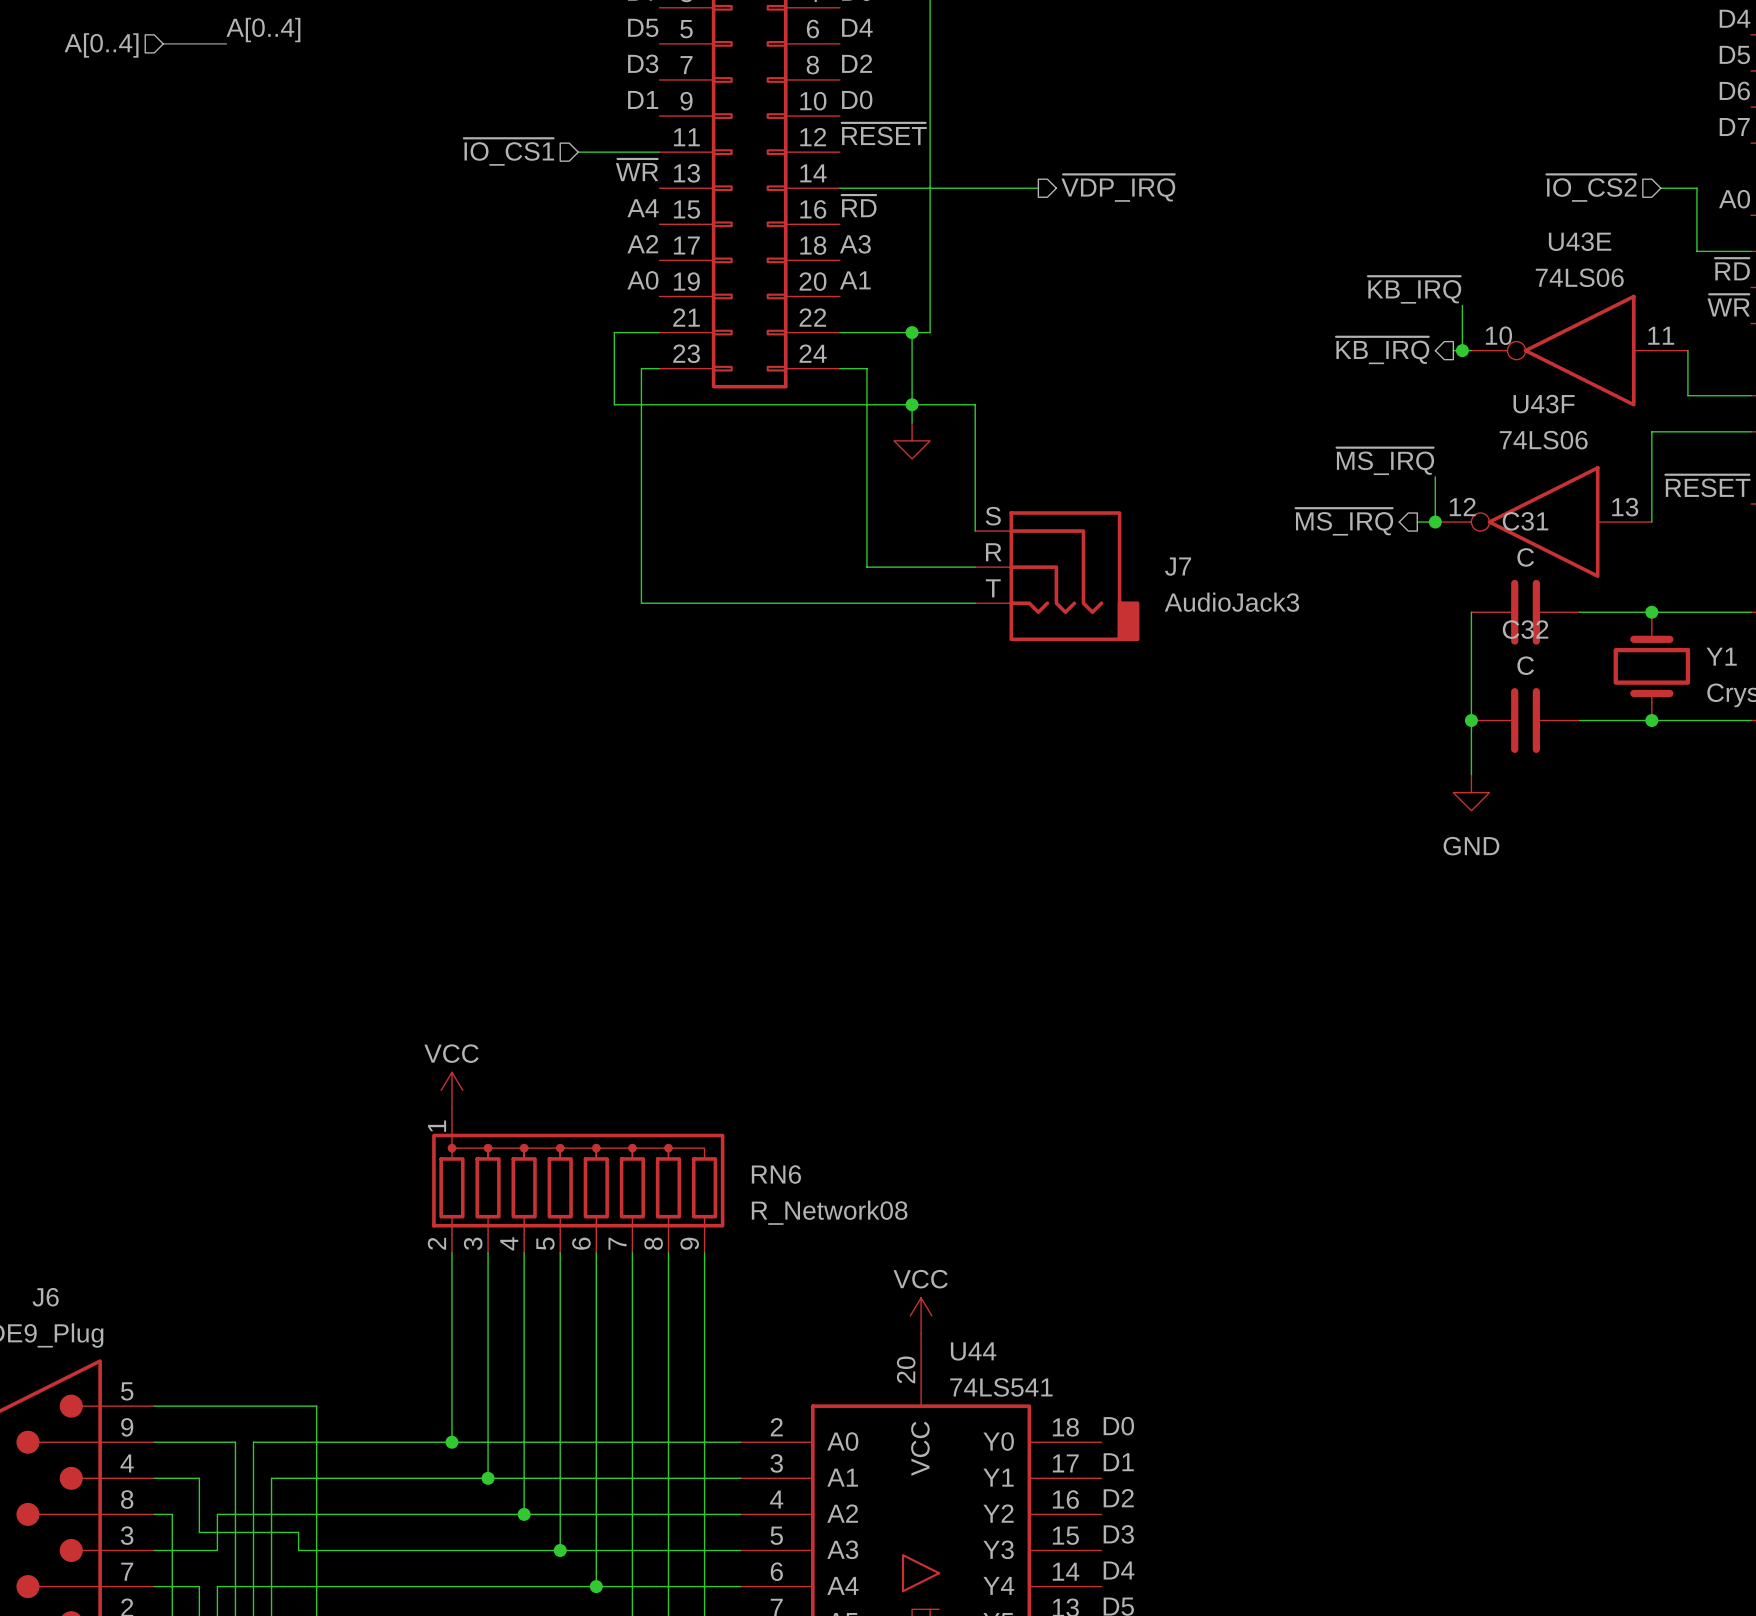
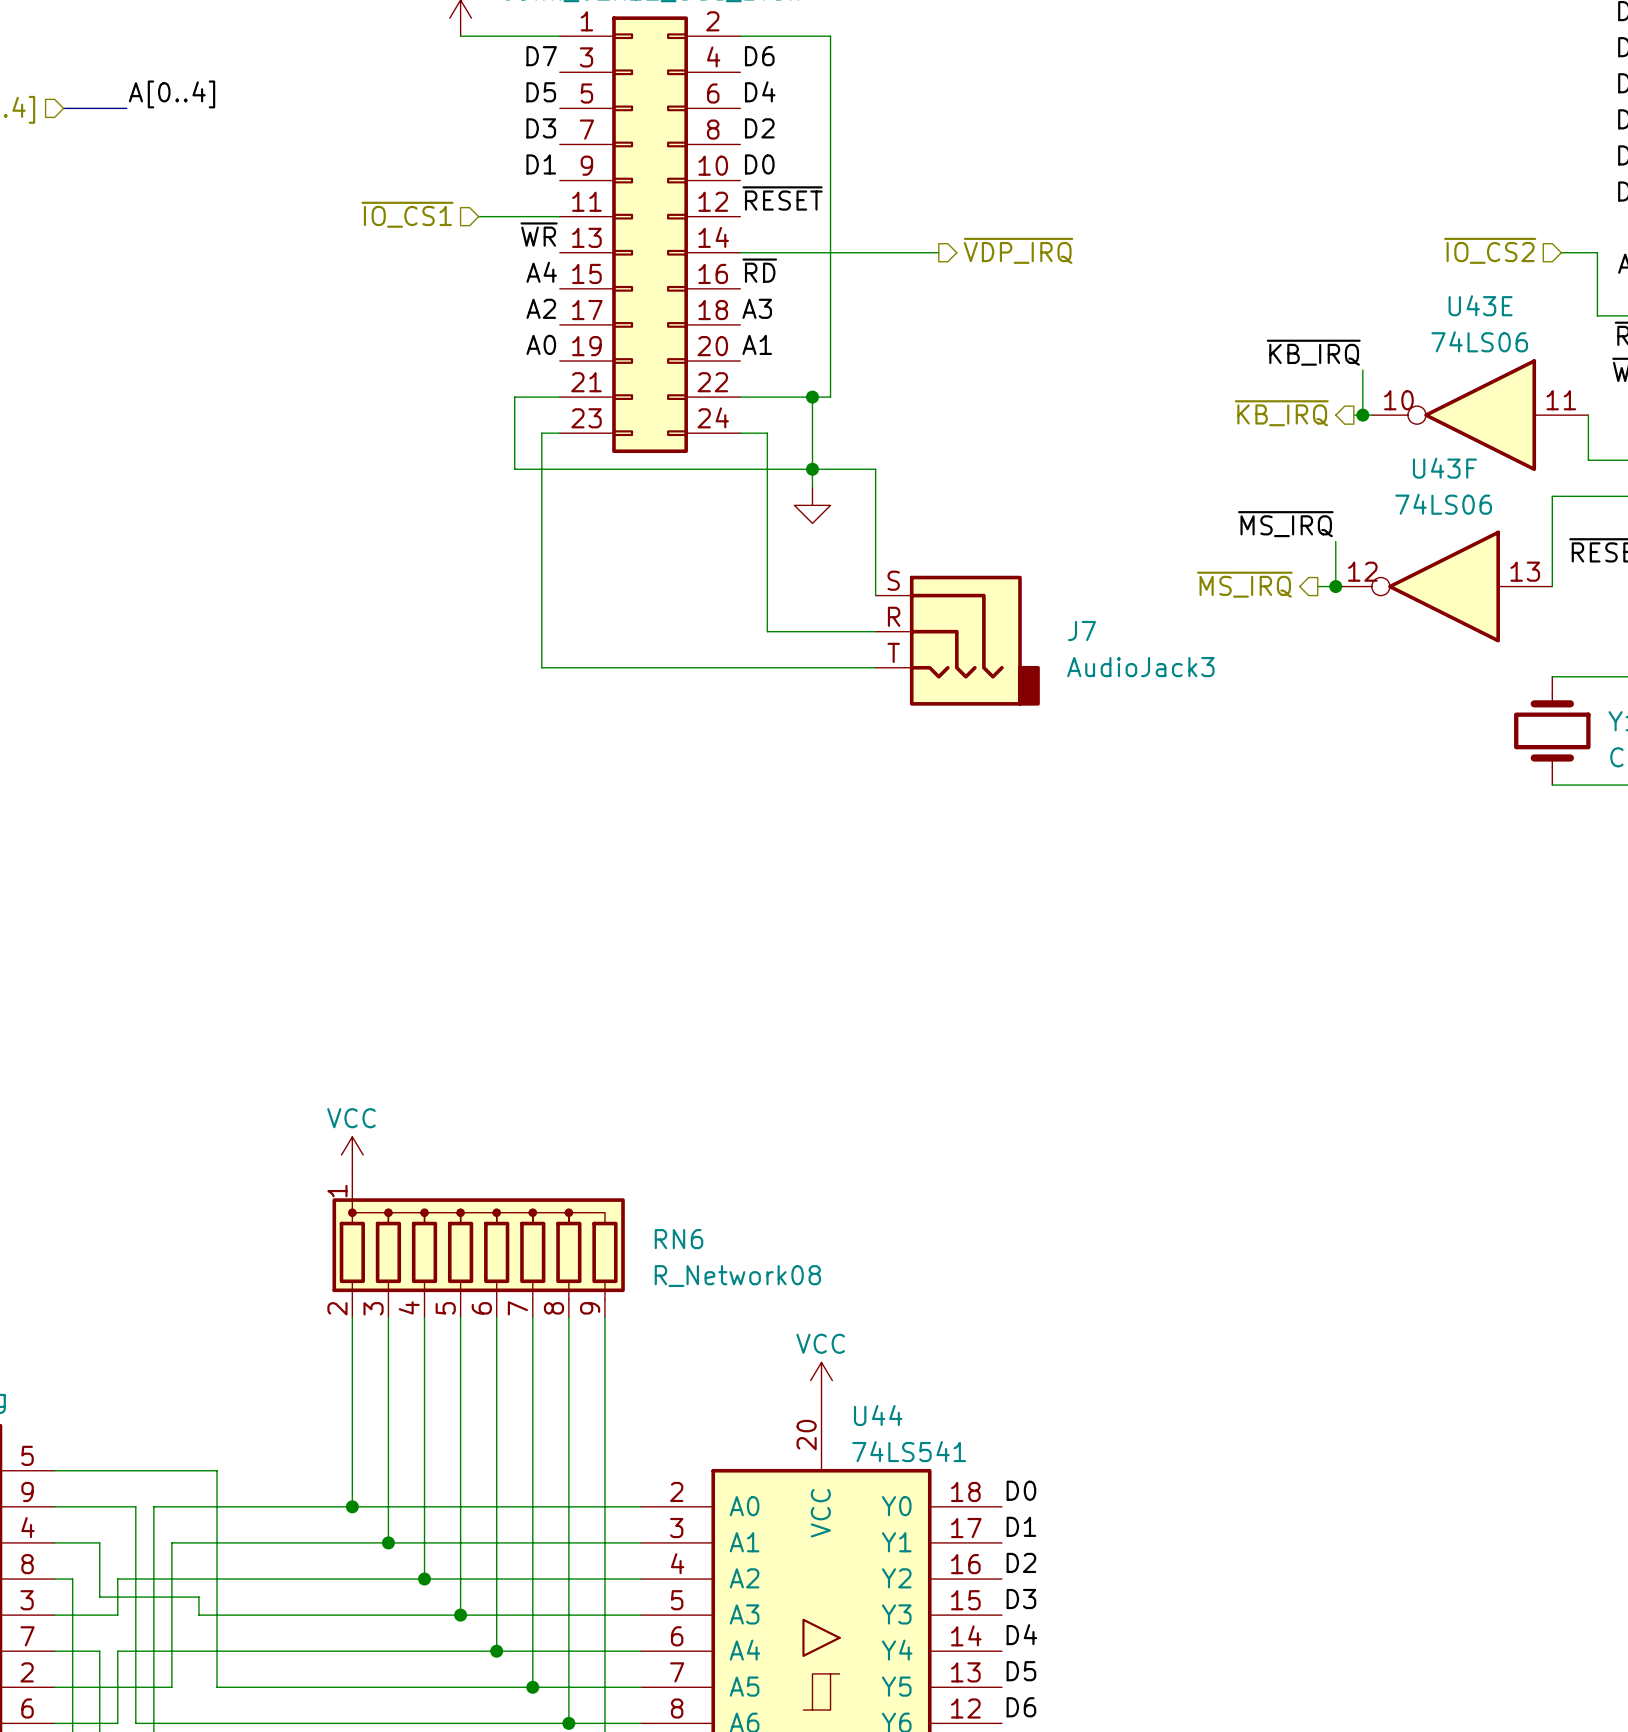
wire: (1471, 612) (1471, 774) -> none
C31: C (1525, 612) -> none
wire: (1579, 612) (1651, 612) -> none
junction: (1651, 612) -> none
junction: (1471, 720) -> none
C32: C (1525, 720) -> none
wire: (1579, 720) (1651, 720) -> none
junction: (1651, 720) -> none
power symbol: GND (1471, 792) -> none

